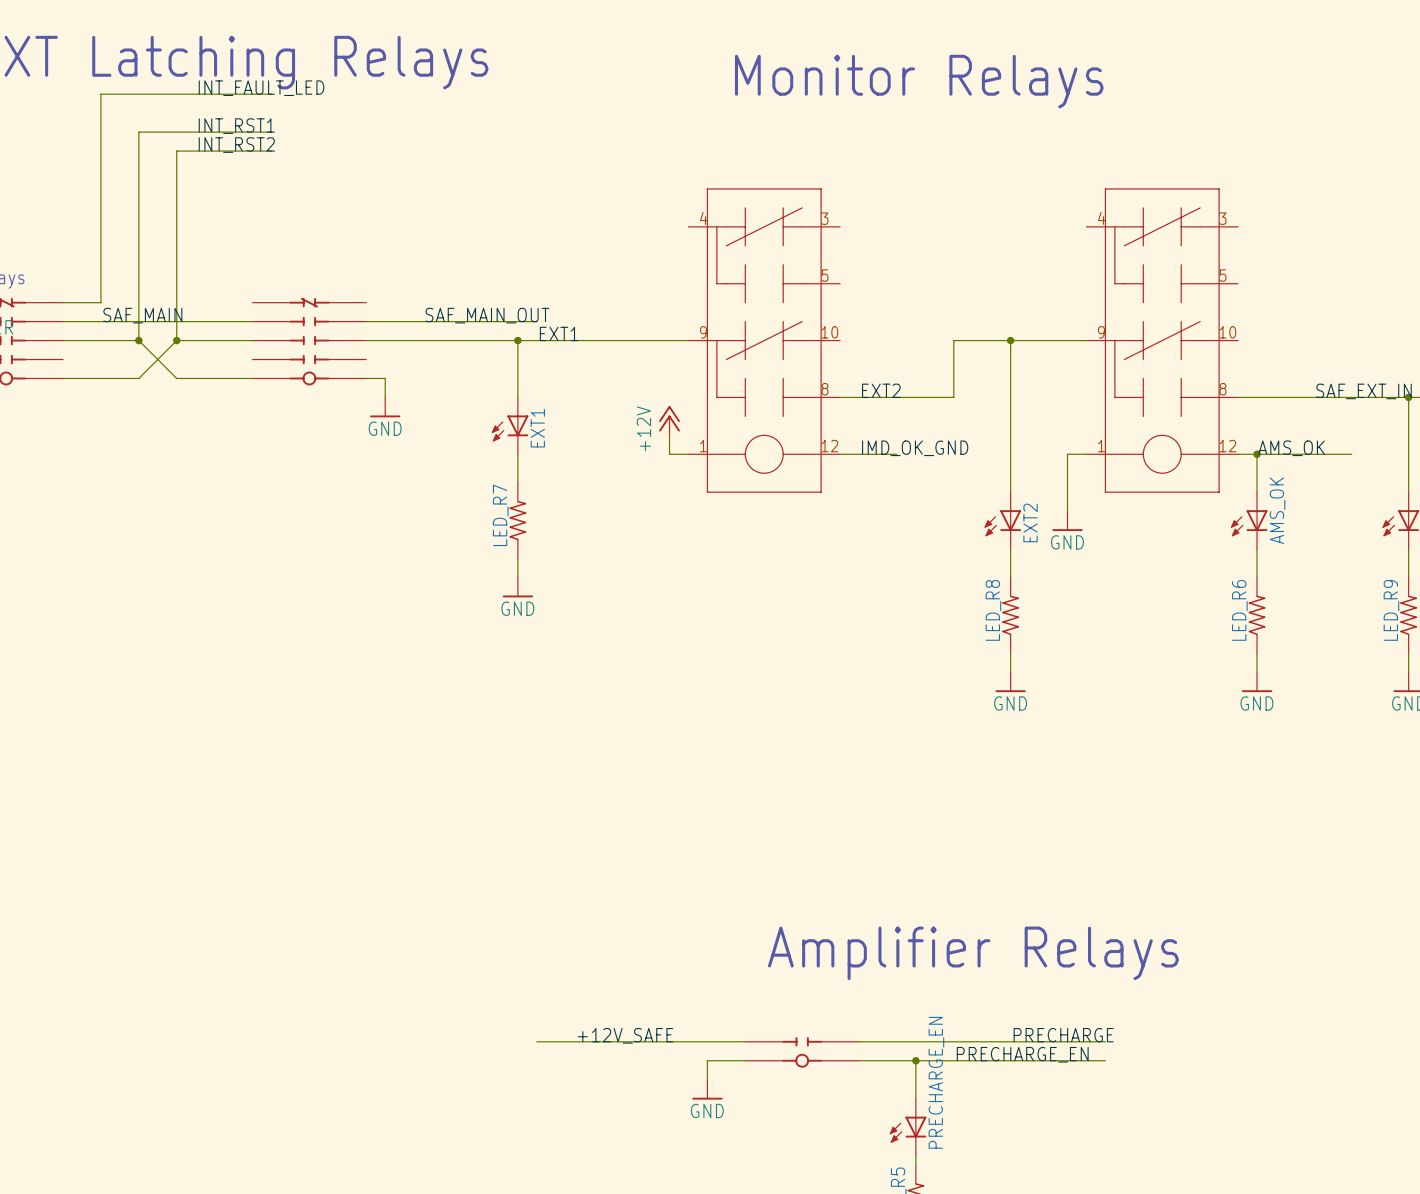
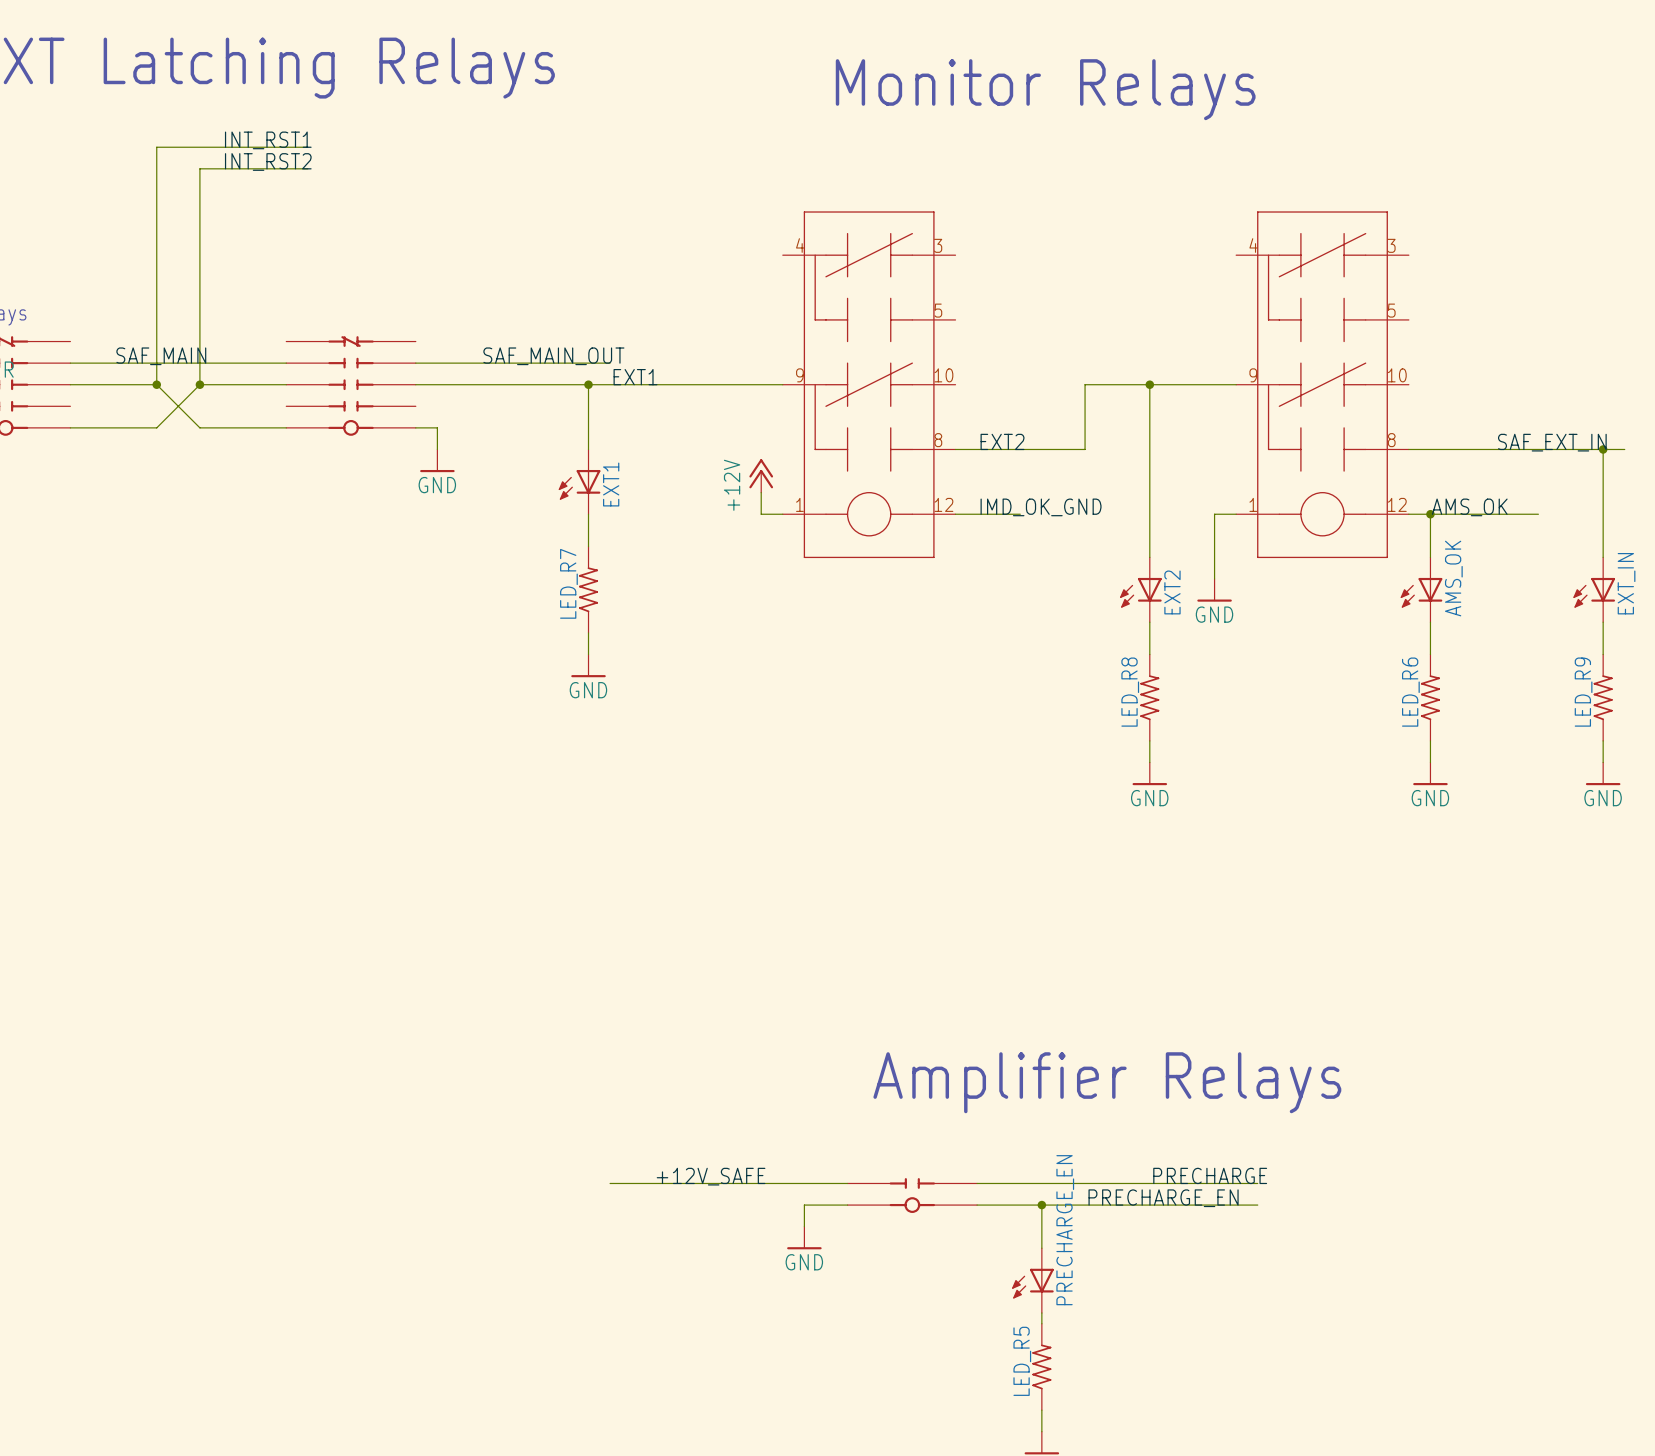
label: INT_FAULT_LED (261, 88) -> none
wire: (271, 94) (100, 94) (100, 302) (63, 302) -> none

